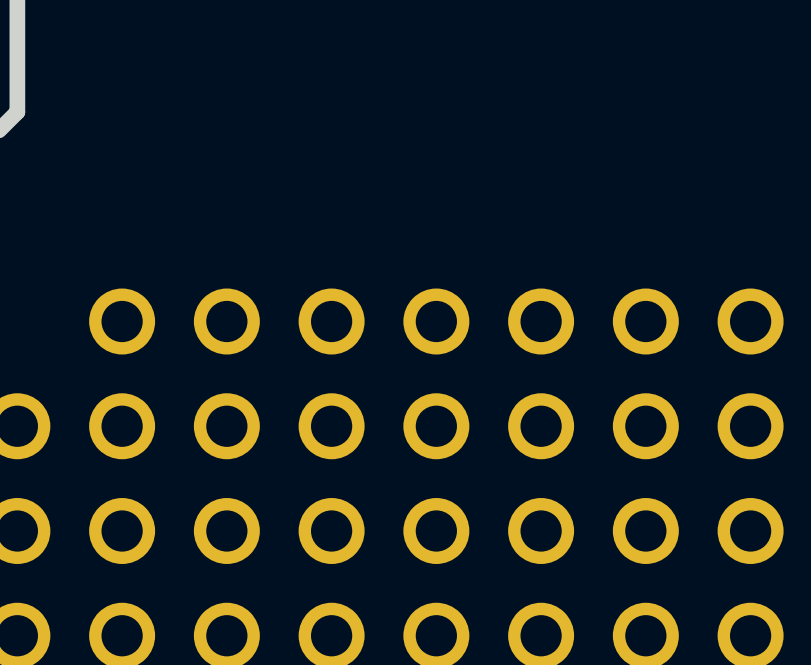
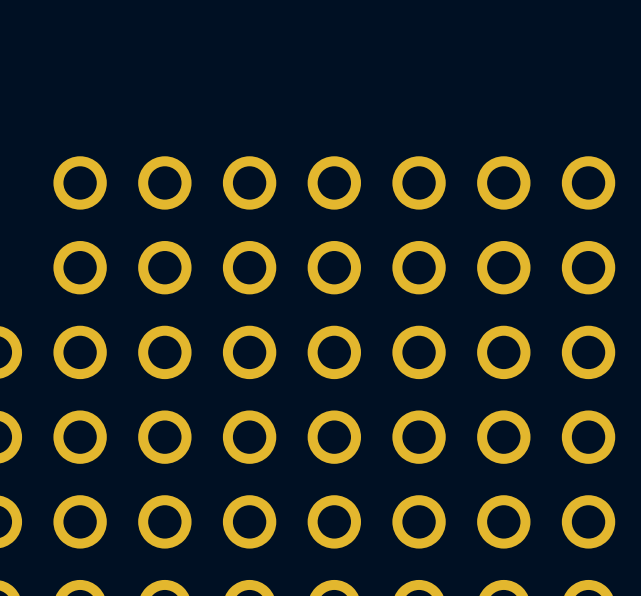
part: none -> (80, 182)
part: none -> (164, 182)
part: none -> (249, 182)
part: none -> (334, 182)
part: none -> (419, 182)
part: none -> (503, 182)
part: none -> (588, 182)

